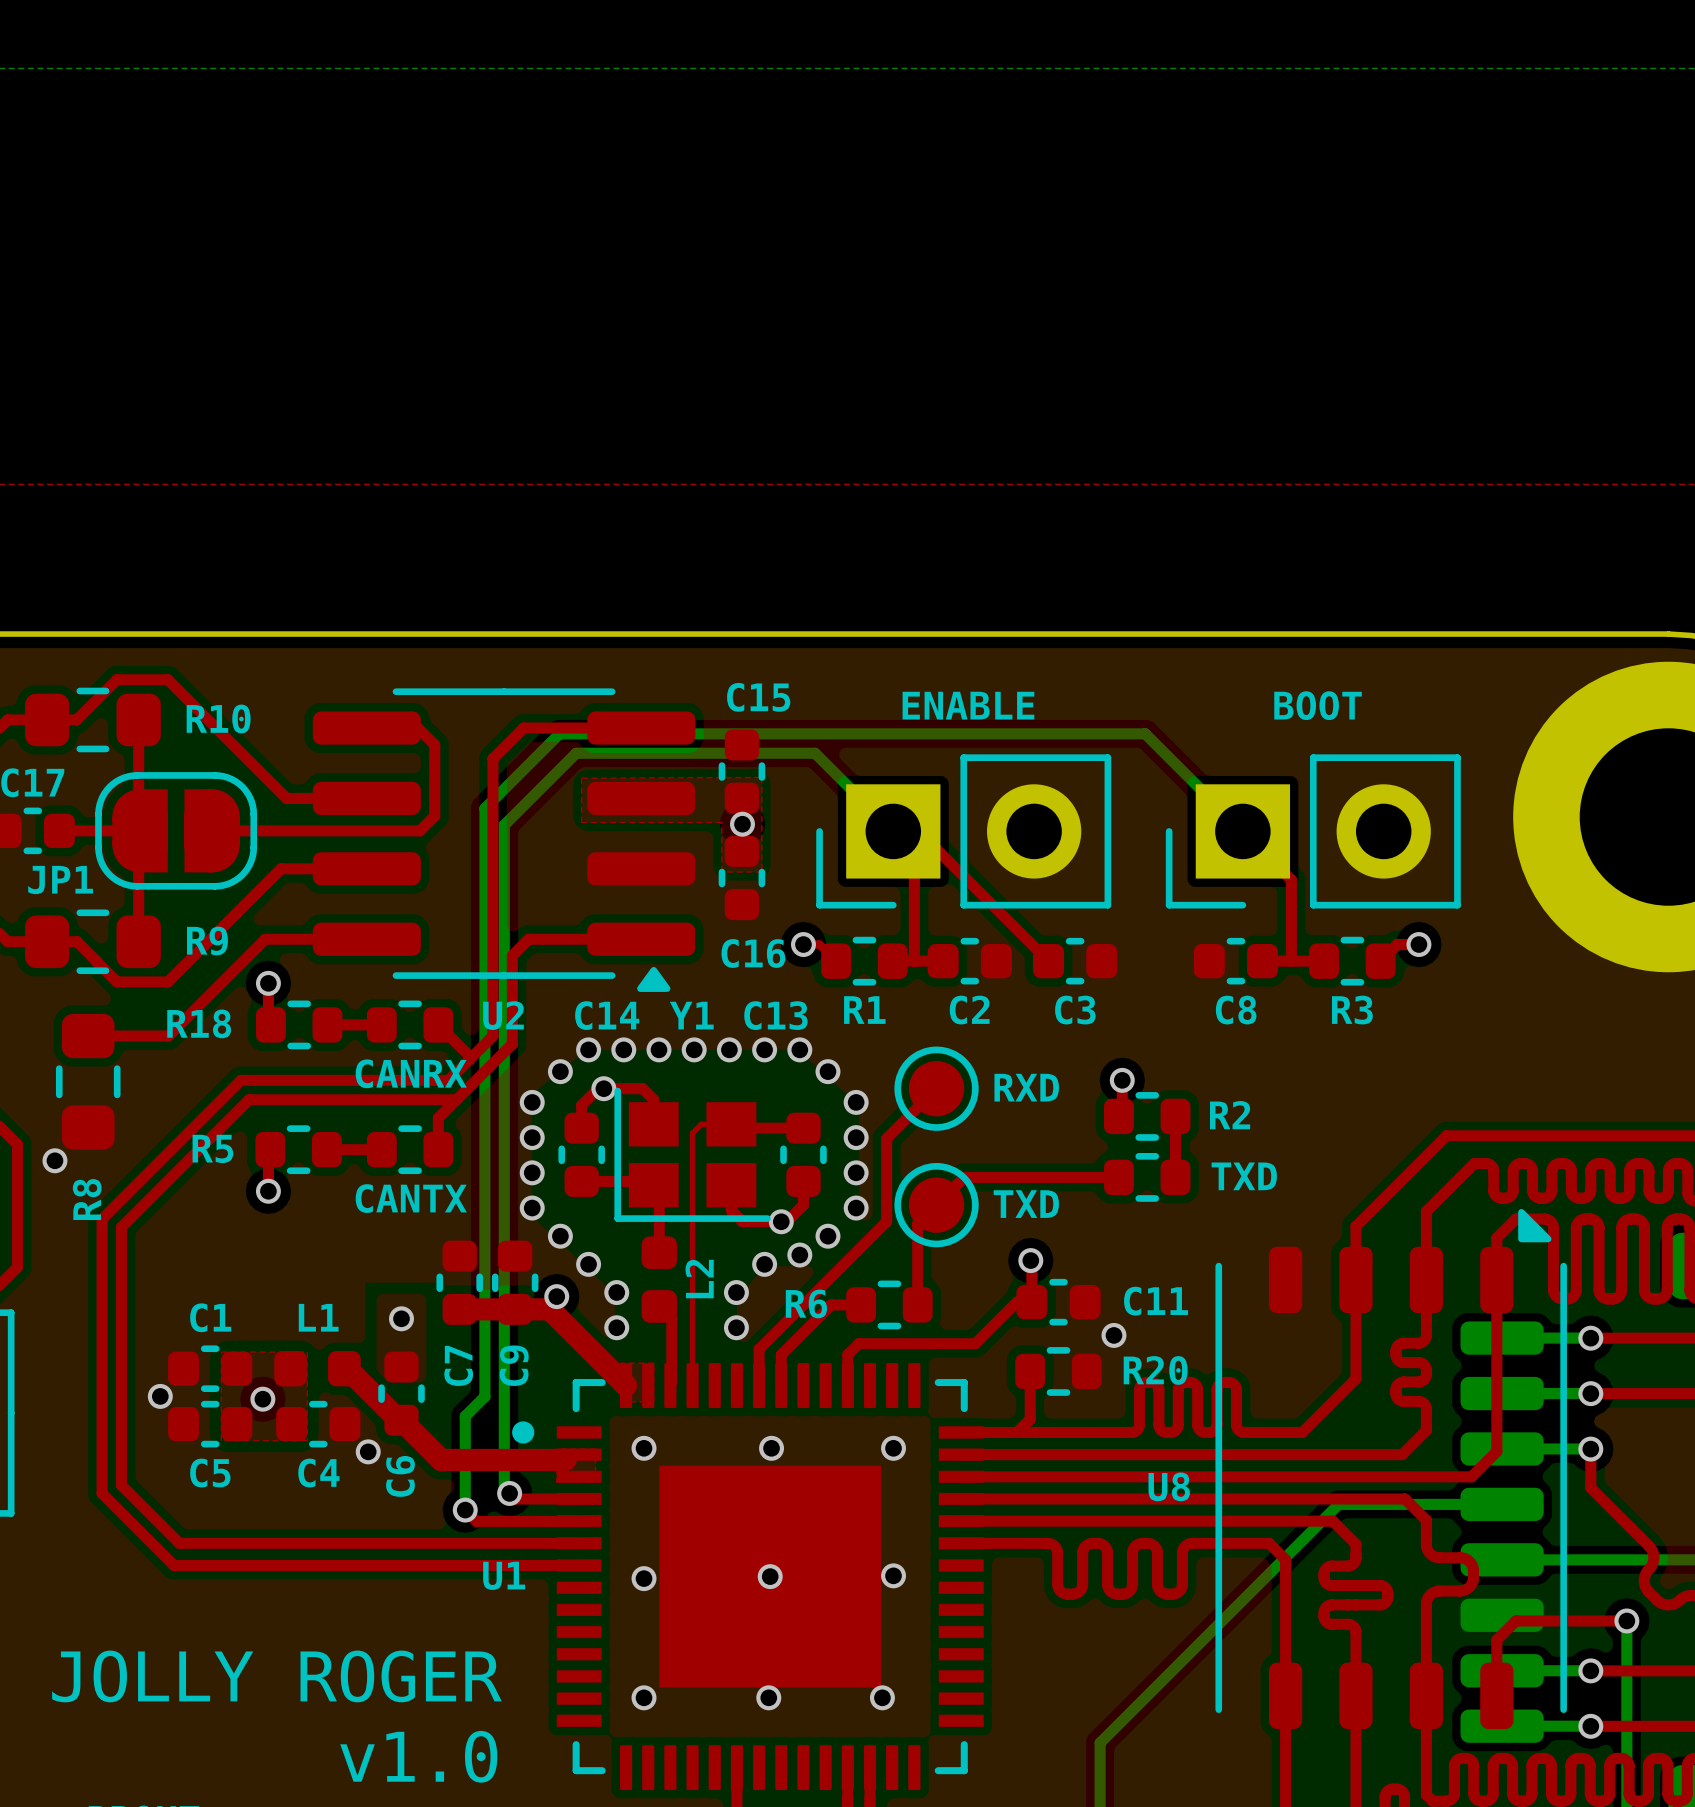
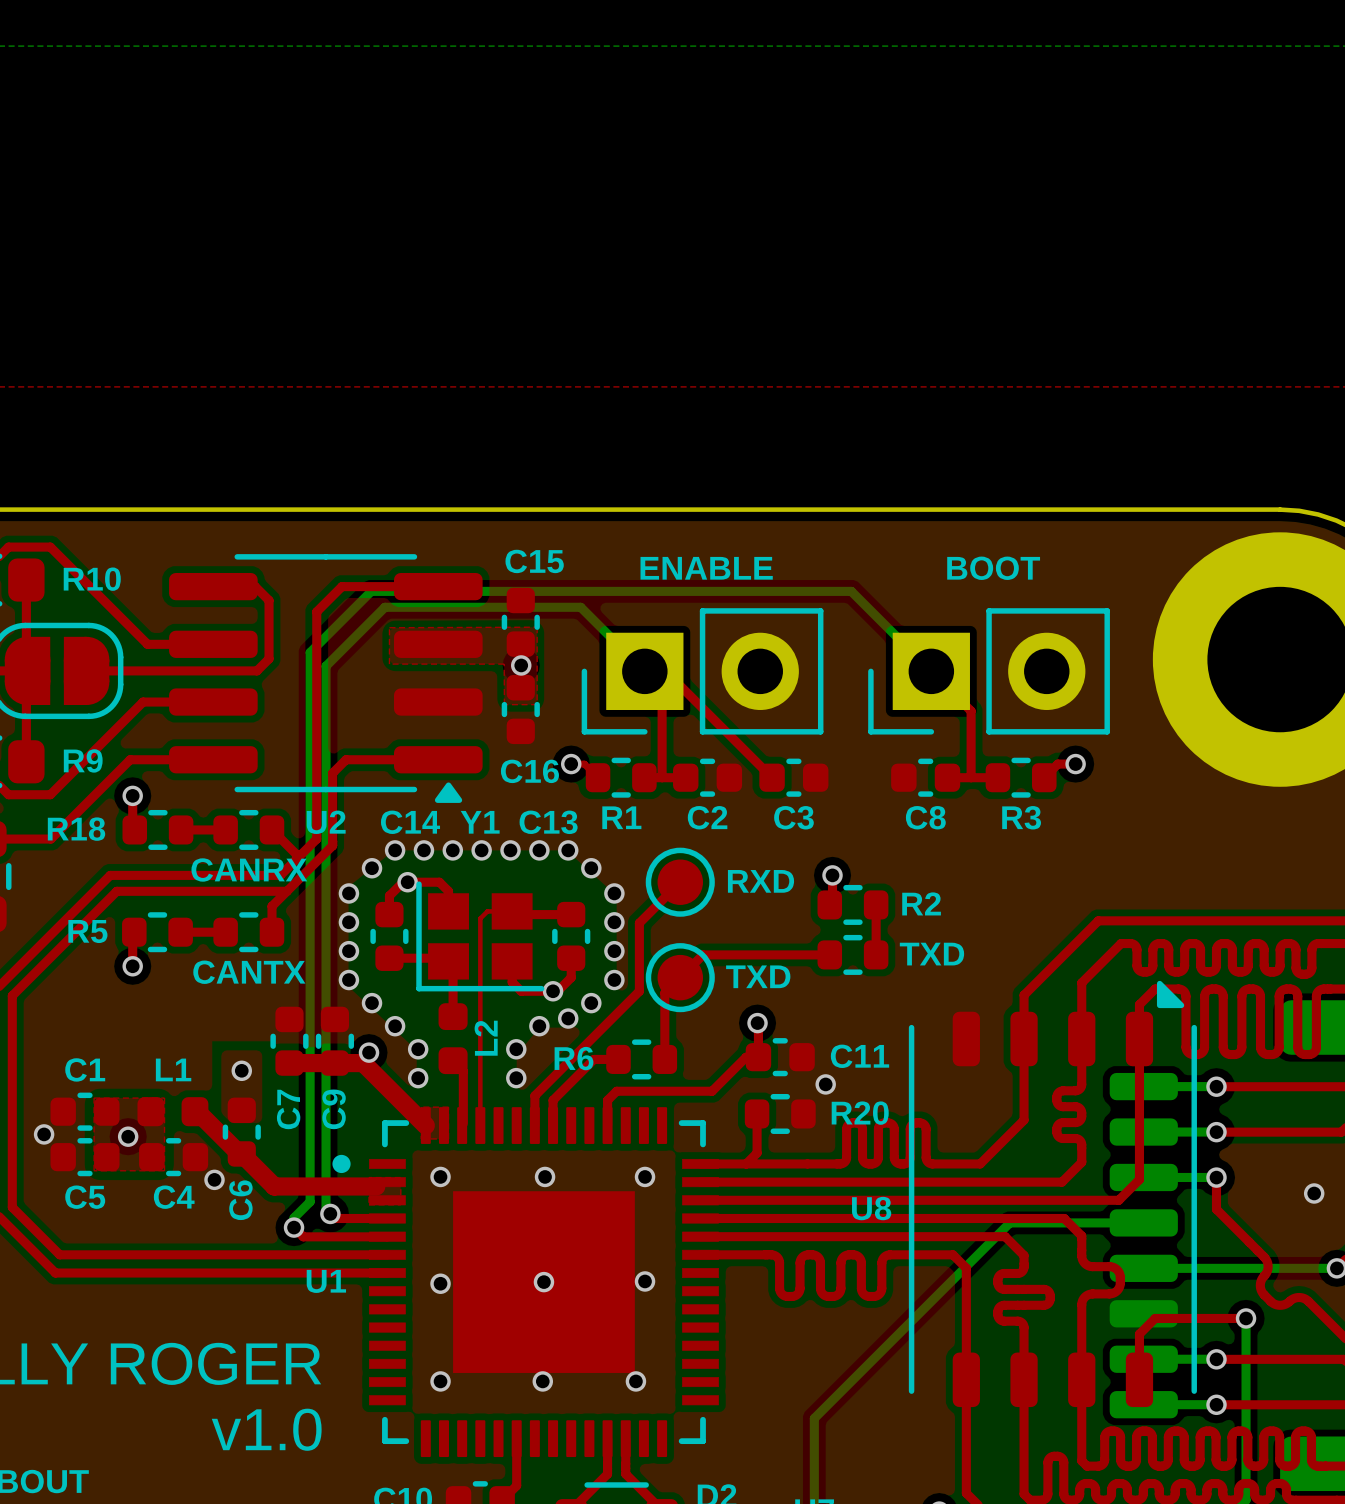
bottom track: (484, 1396) (465, 1416) (465, 1498) -> (310, 1134) (310, 1201) (294, 1217)

